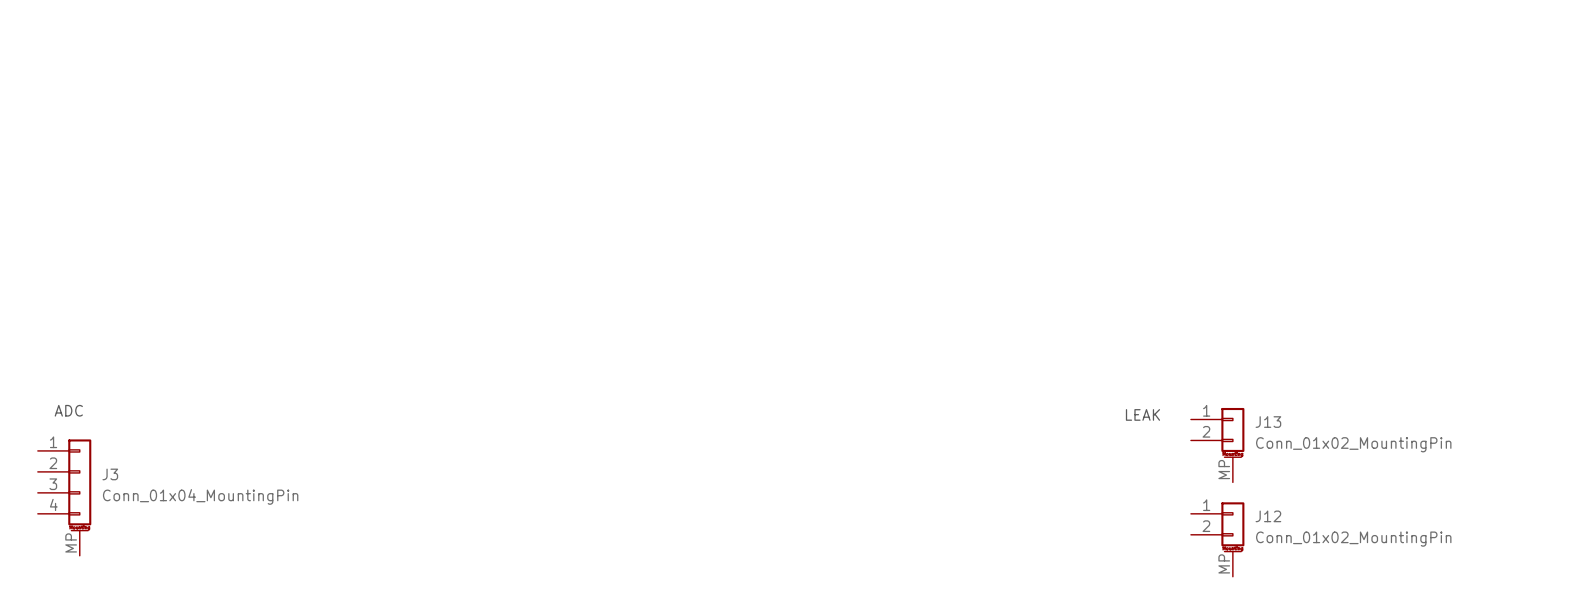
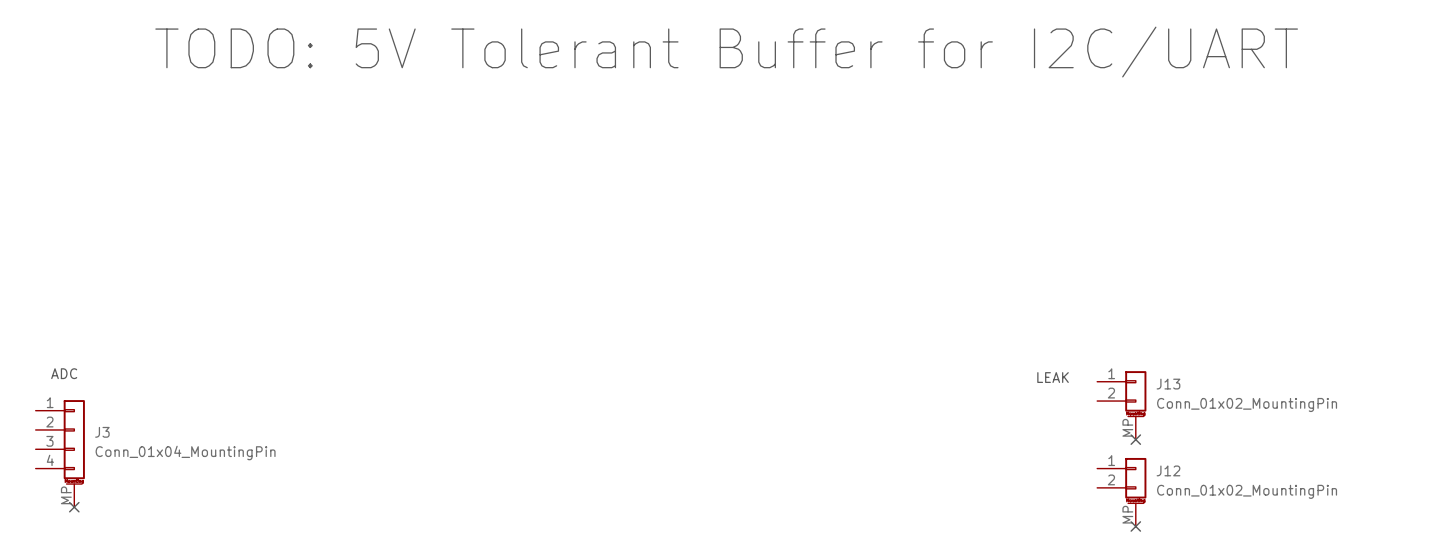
text: none -> TODO: 5V Tolerant Buffer for I2C/UART (726, 52)
no-connect mark: none -> (1135, 439)
no-connect mark: none -> (74, 507)
no-connect mark: none -> (1135, 526)

